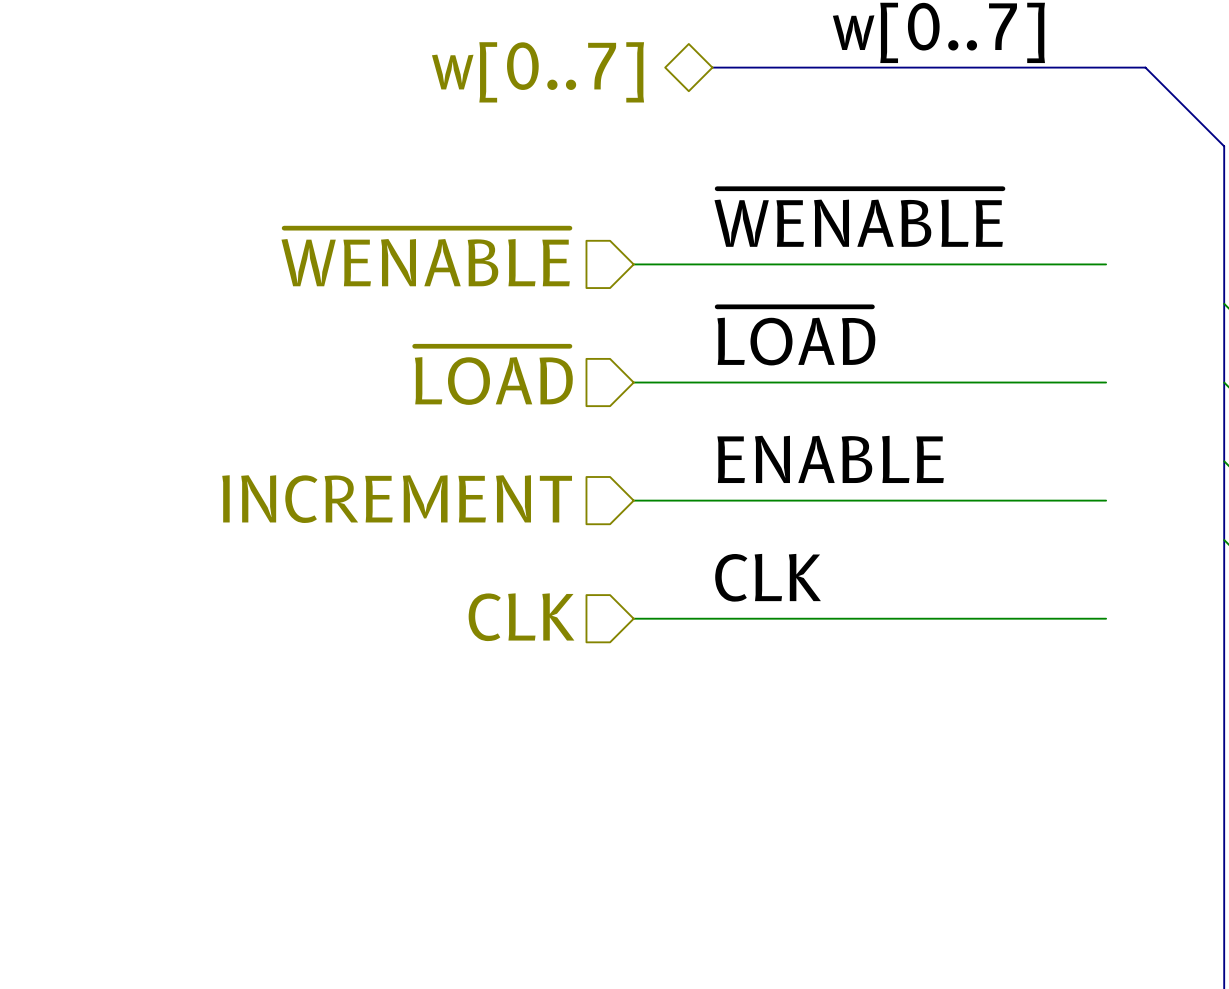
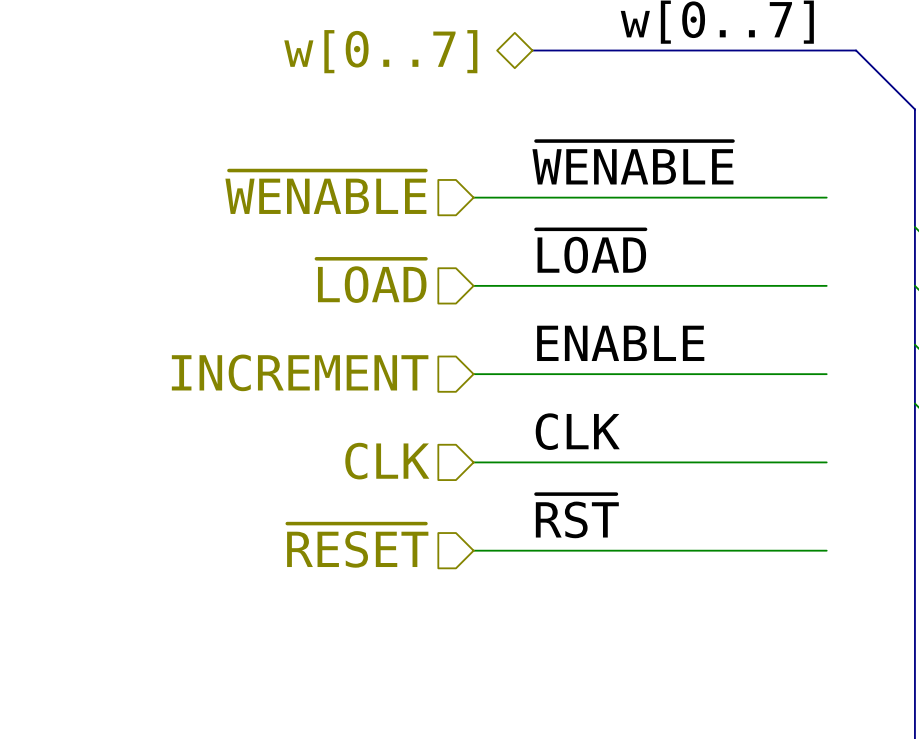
label: none -> ~{RST} (577, 516)
hierarchical label: none -> ~{RESET} (357, 545)
wire: none -> (473, 550) (826, 550)

